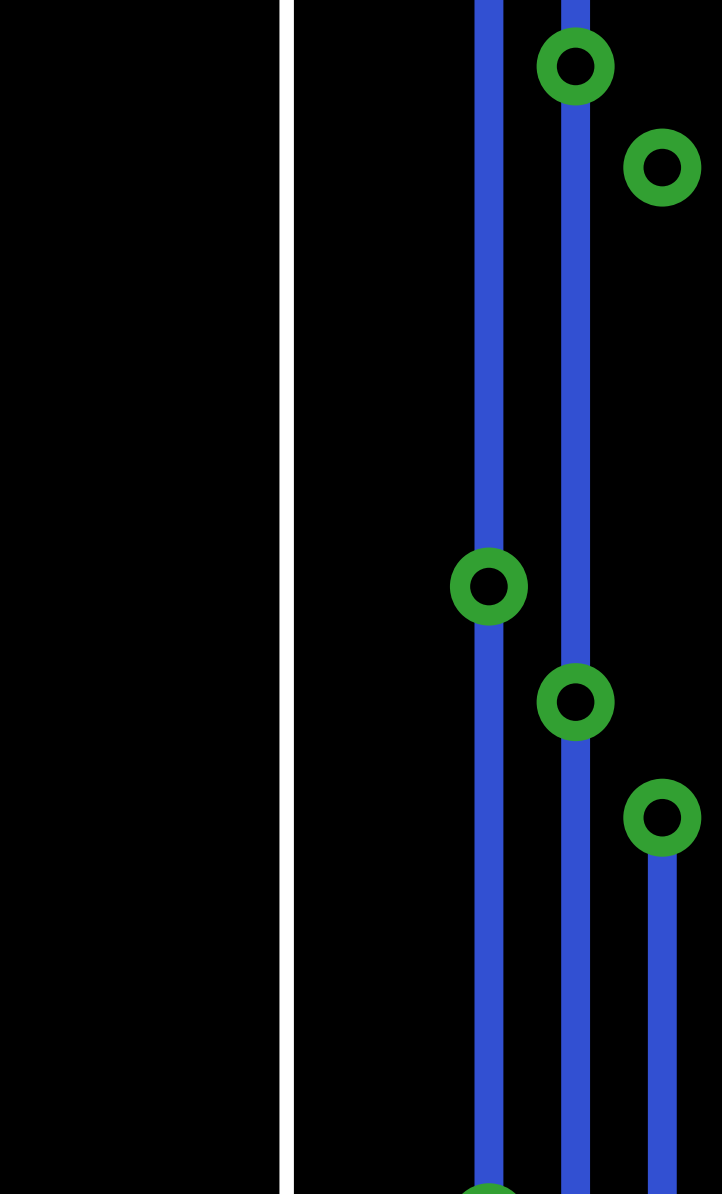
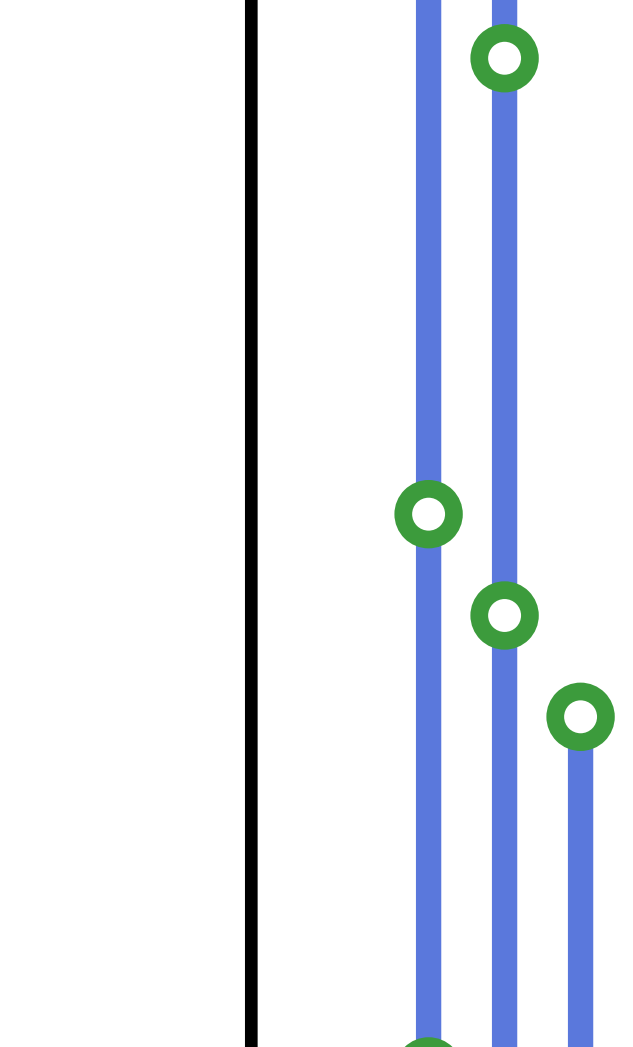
via: (662, 167) -> none

